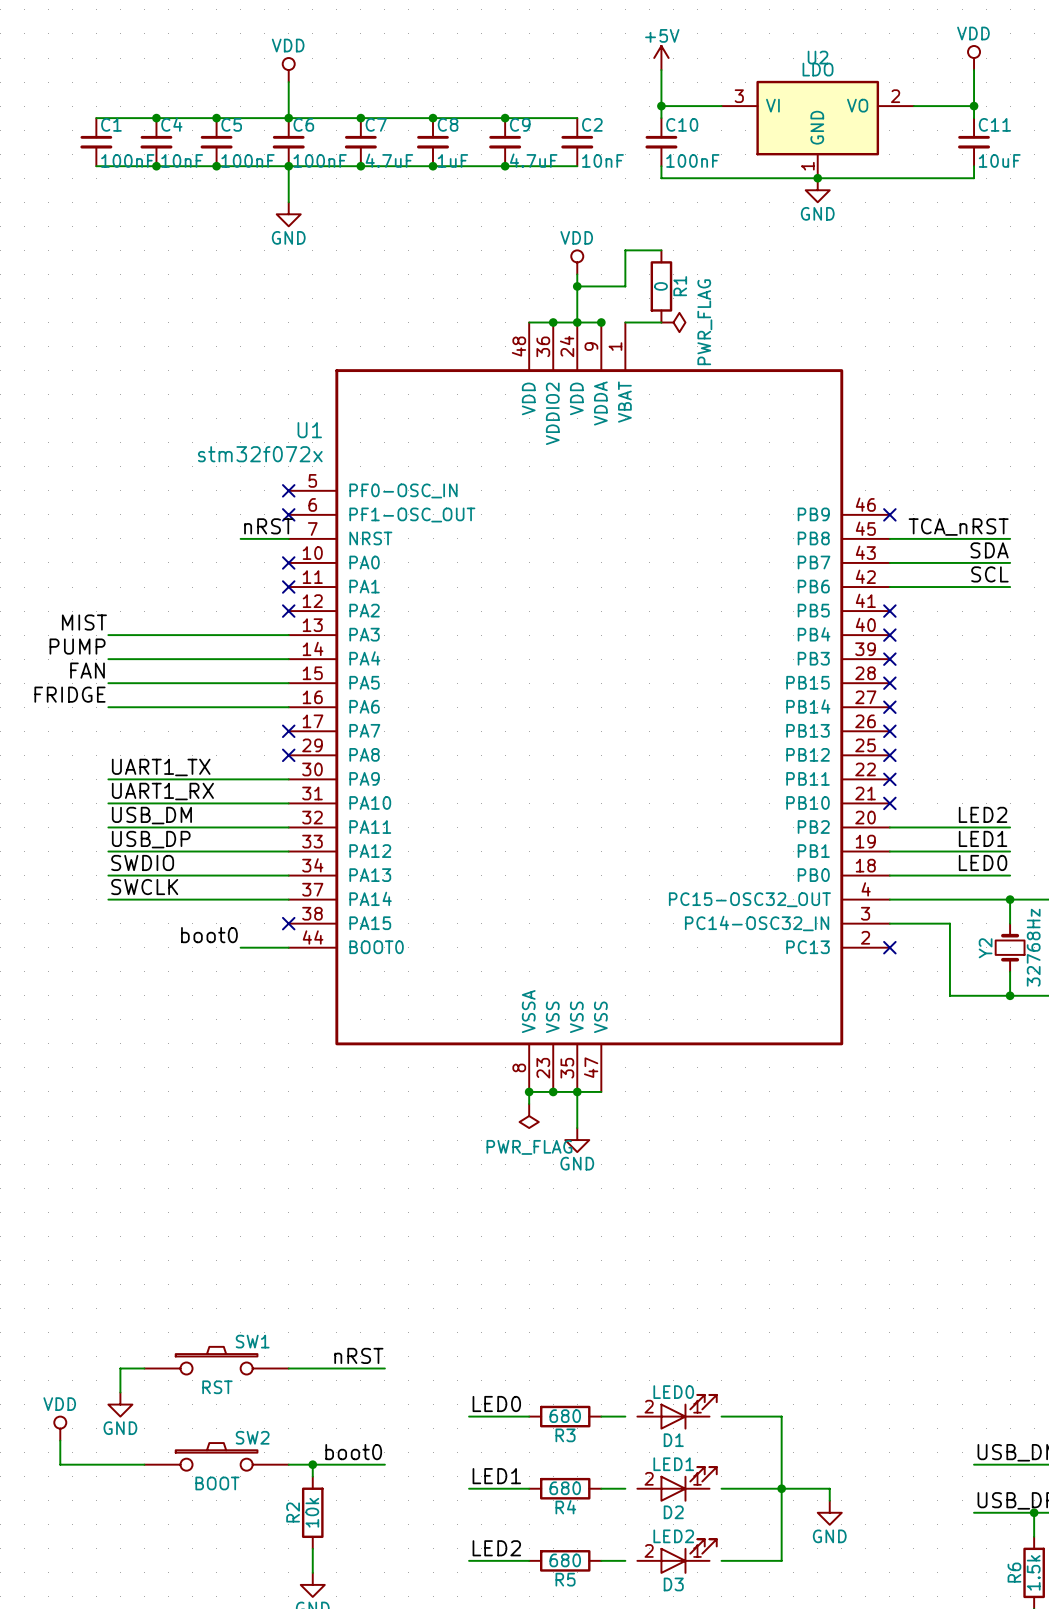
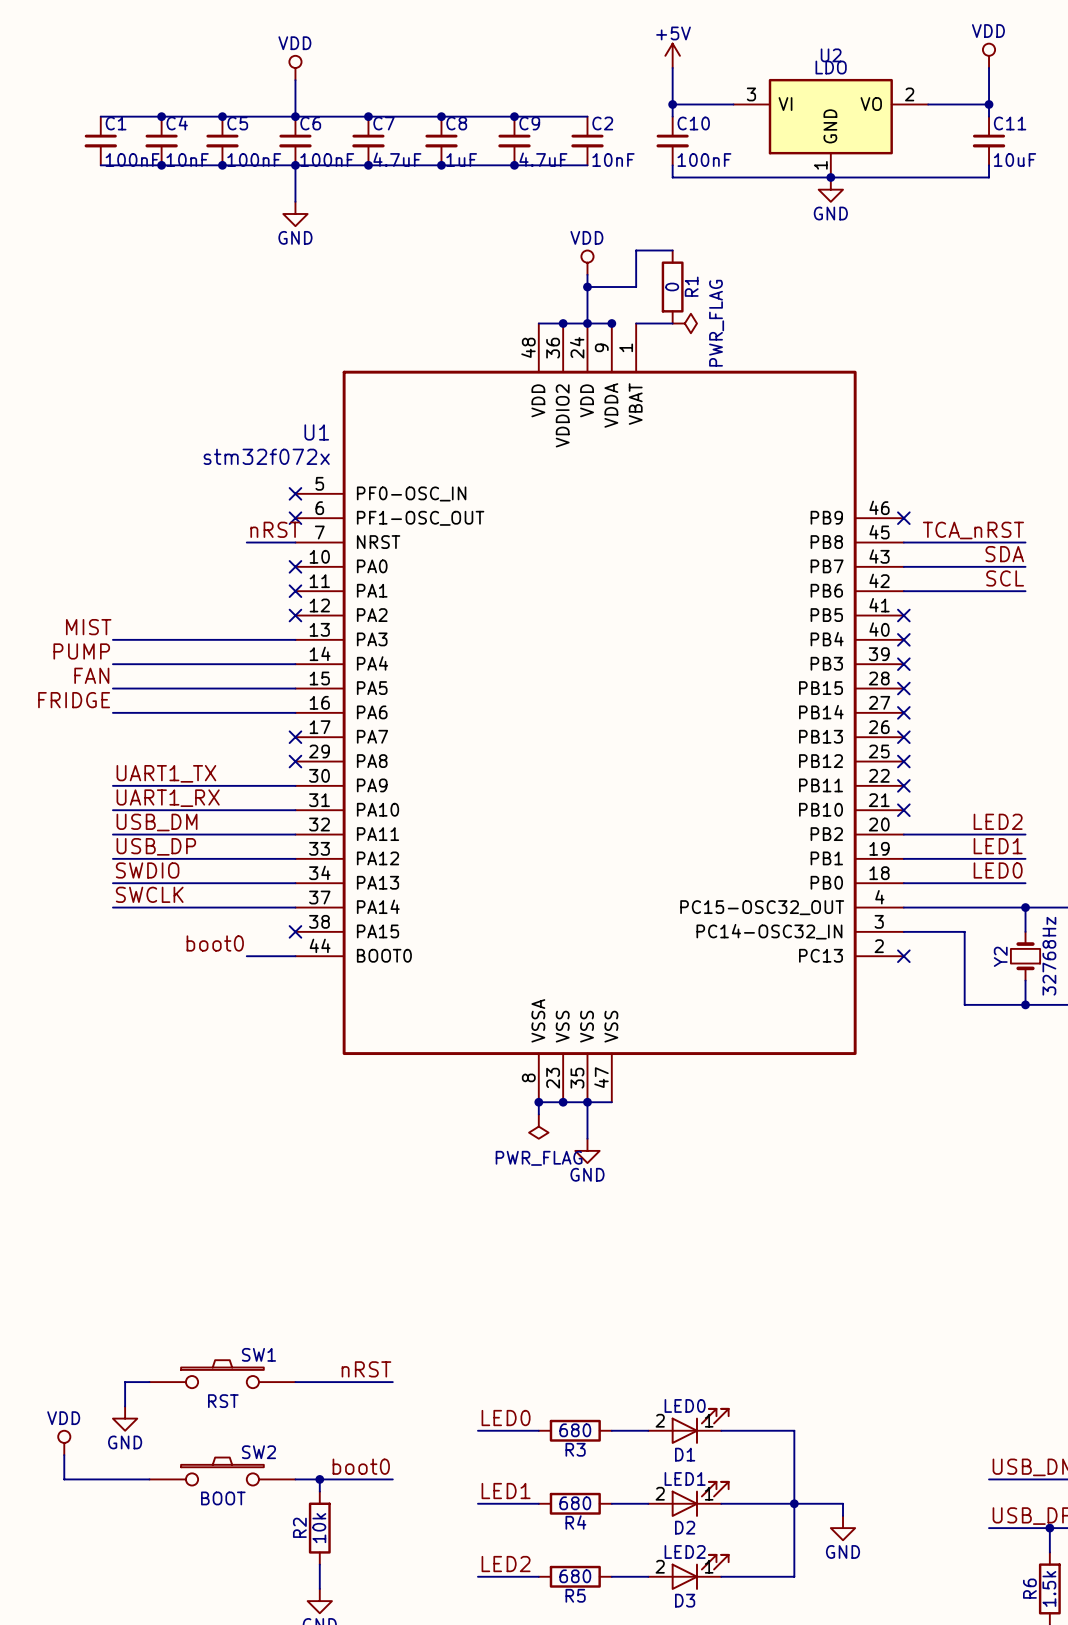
wire: none -> (636, 1430) (648, 1430)
wire: none -> (721, 1430) (733, 1430)
wire: none -> (636, 1503) (648, 1503)
wire: none -> (721, 1503) (733, 1503)
wire: none -> (636, 1576) (648, 1576)
wire: none -> (721, 1576) (733, 1576)

